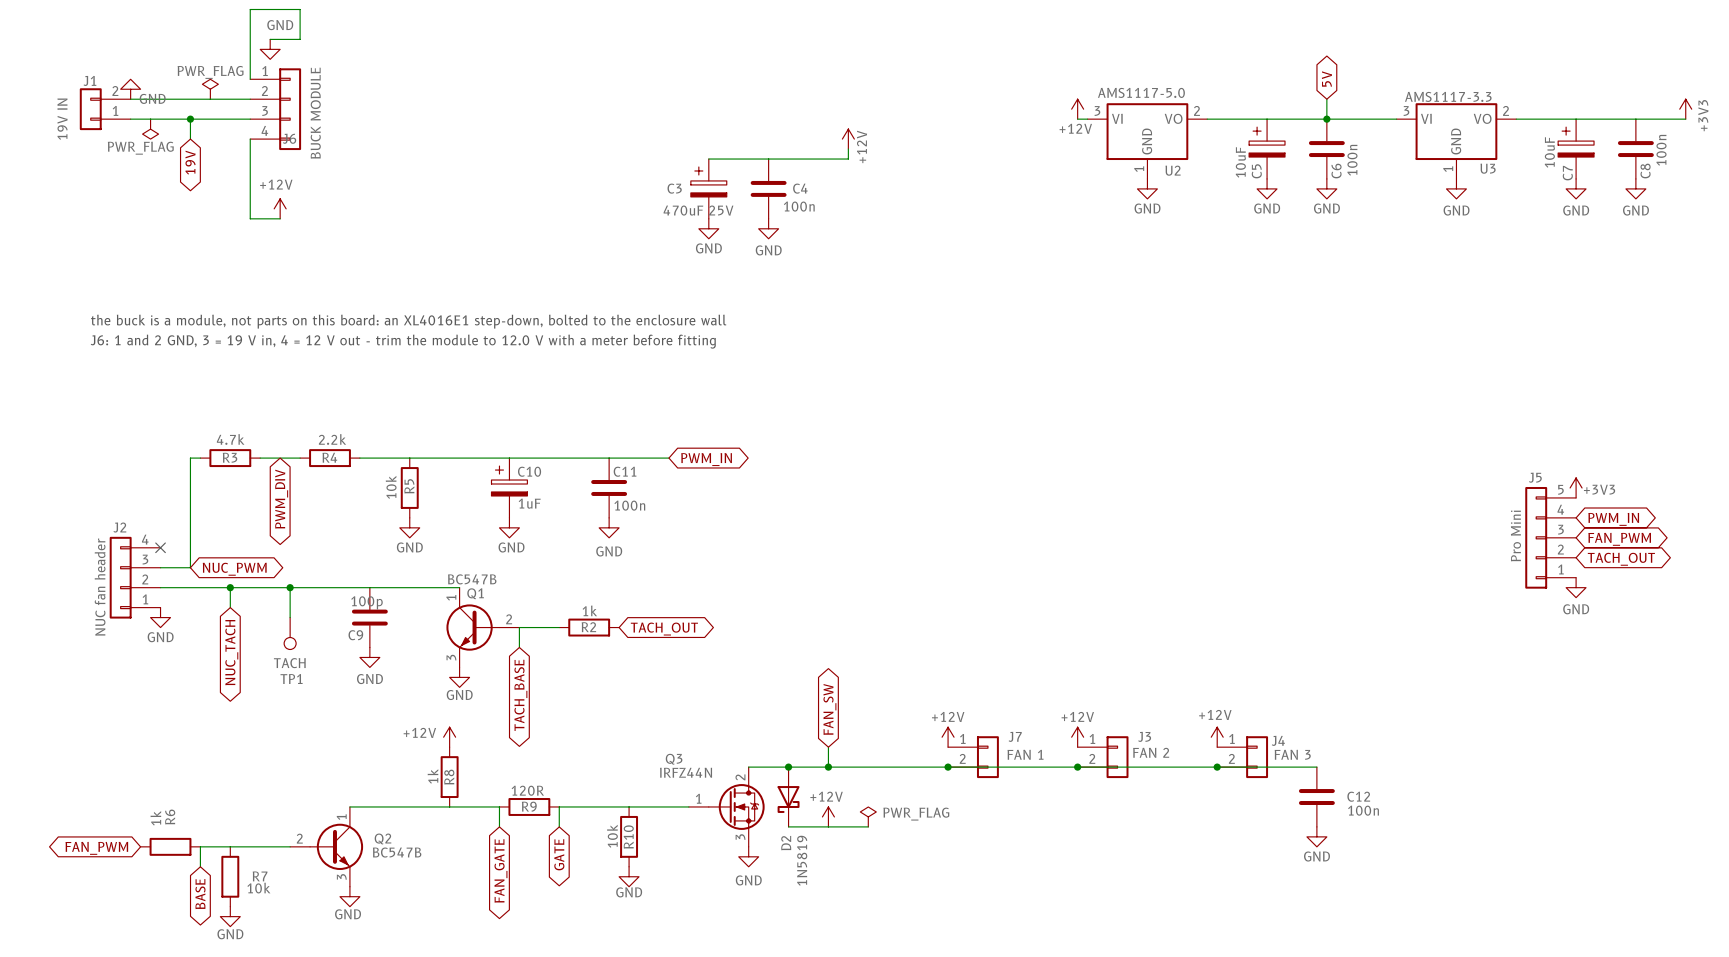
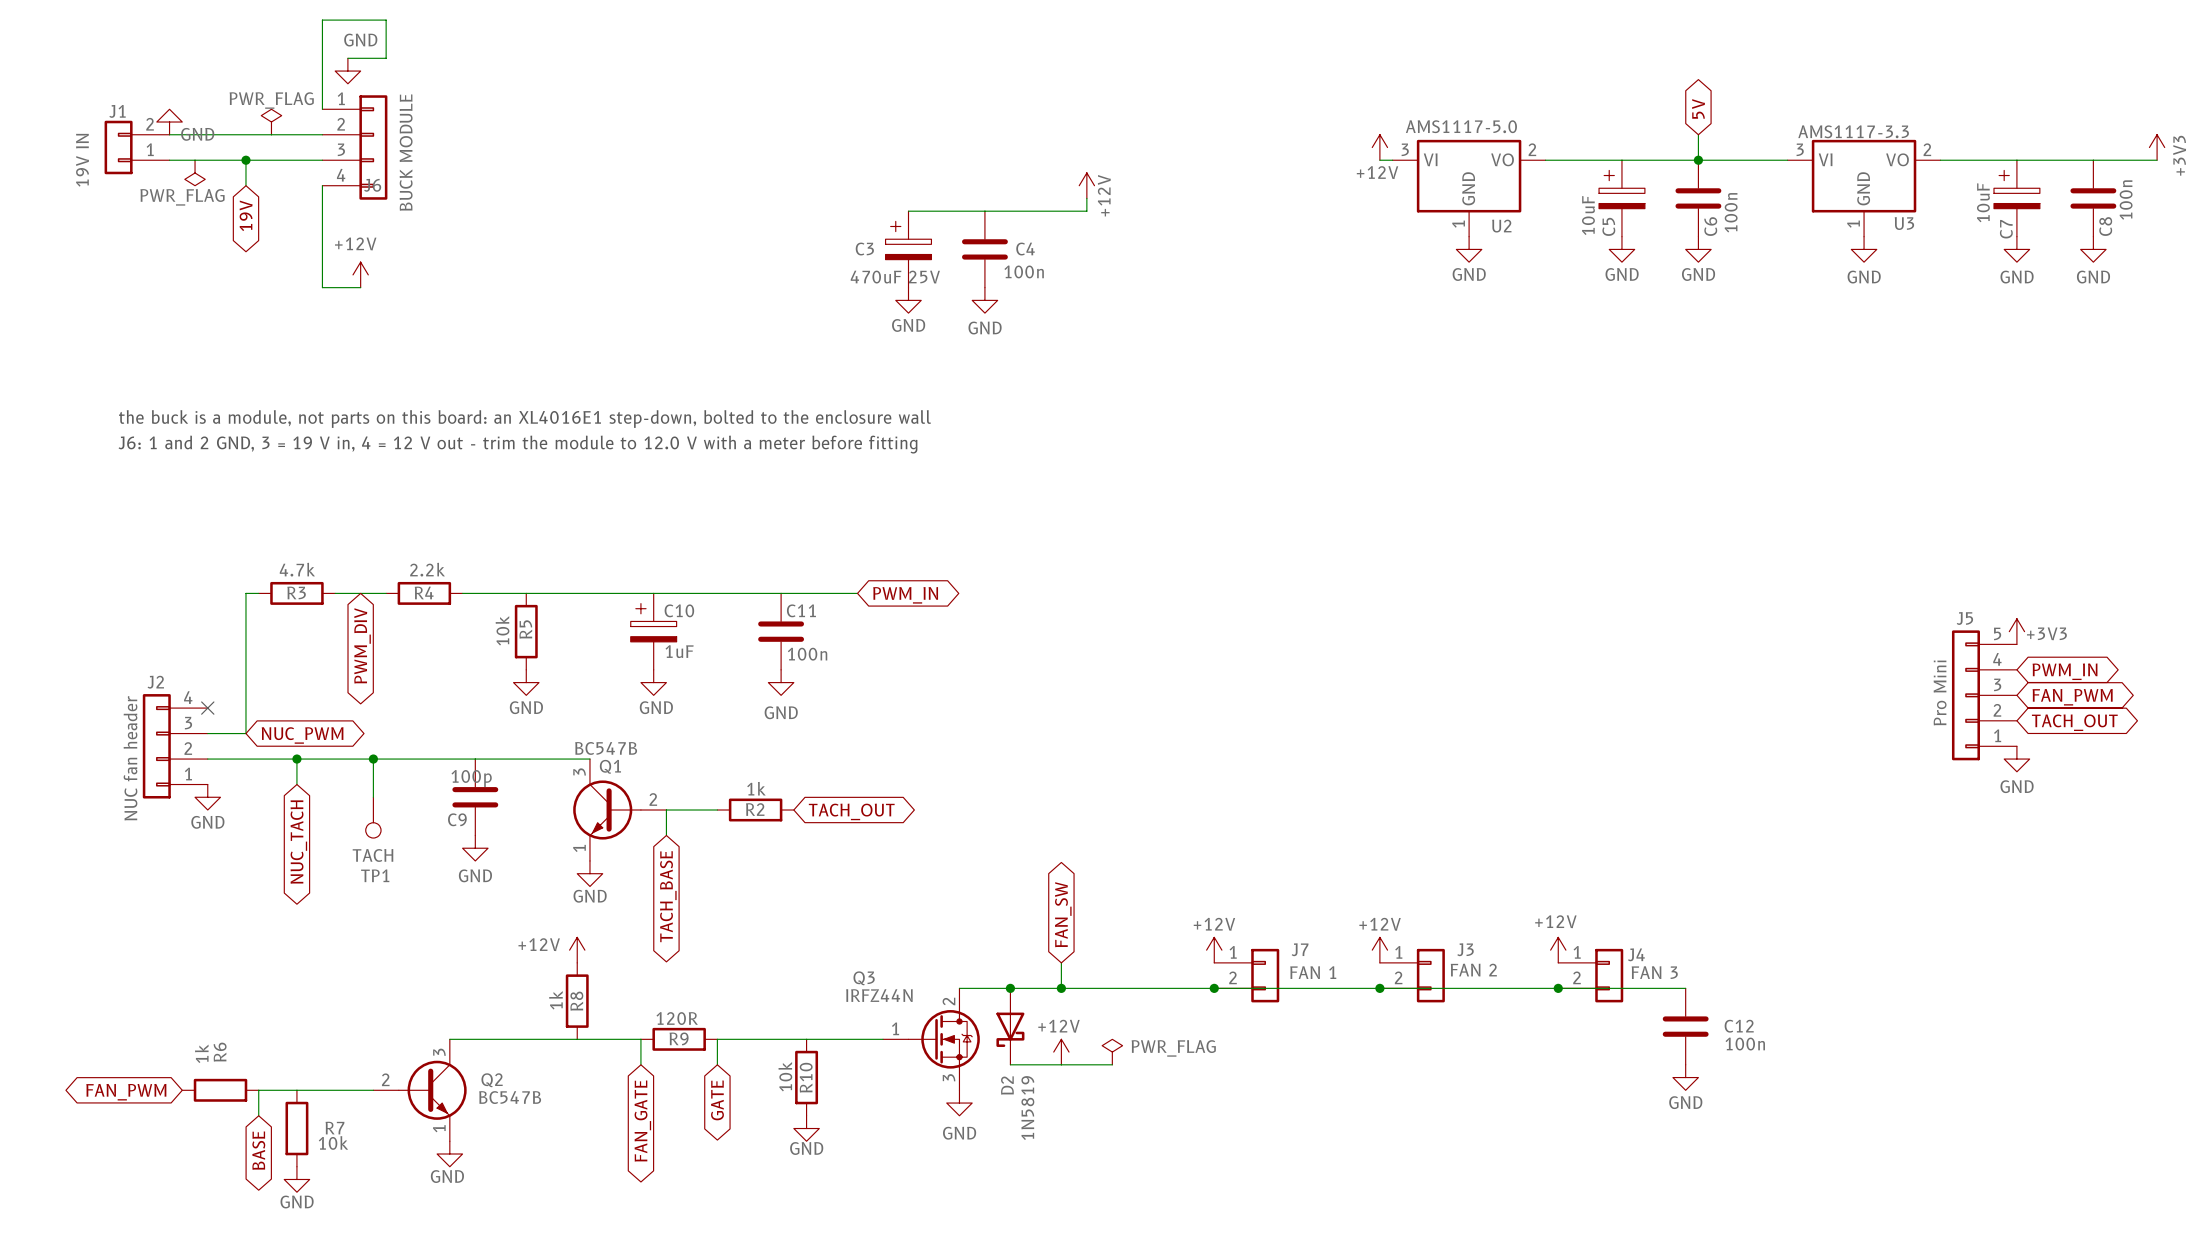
Q1 pin number: 1 (451, 597) -> 3 (579, 771)
Q1 pin number: 3 (451, 657) -> 1 (579, 848)
Q2 pin number: 1 (341, 817) -> 3 (439, 1052)
Q2 pin number: 3 (341, 876) -> 1 (439, 1128)

